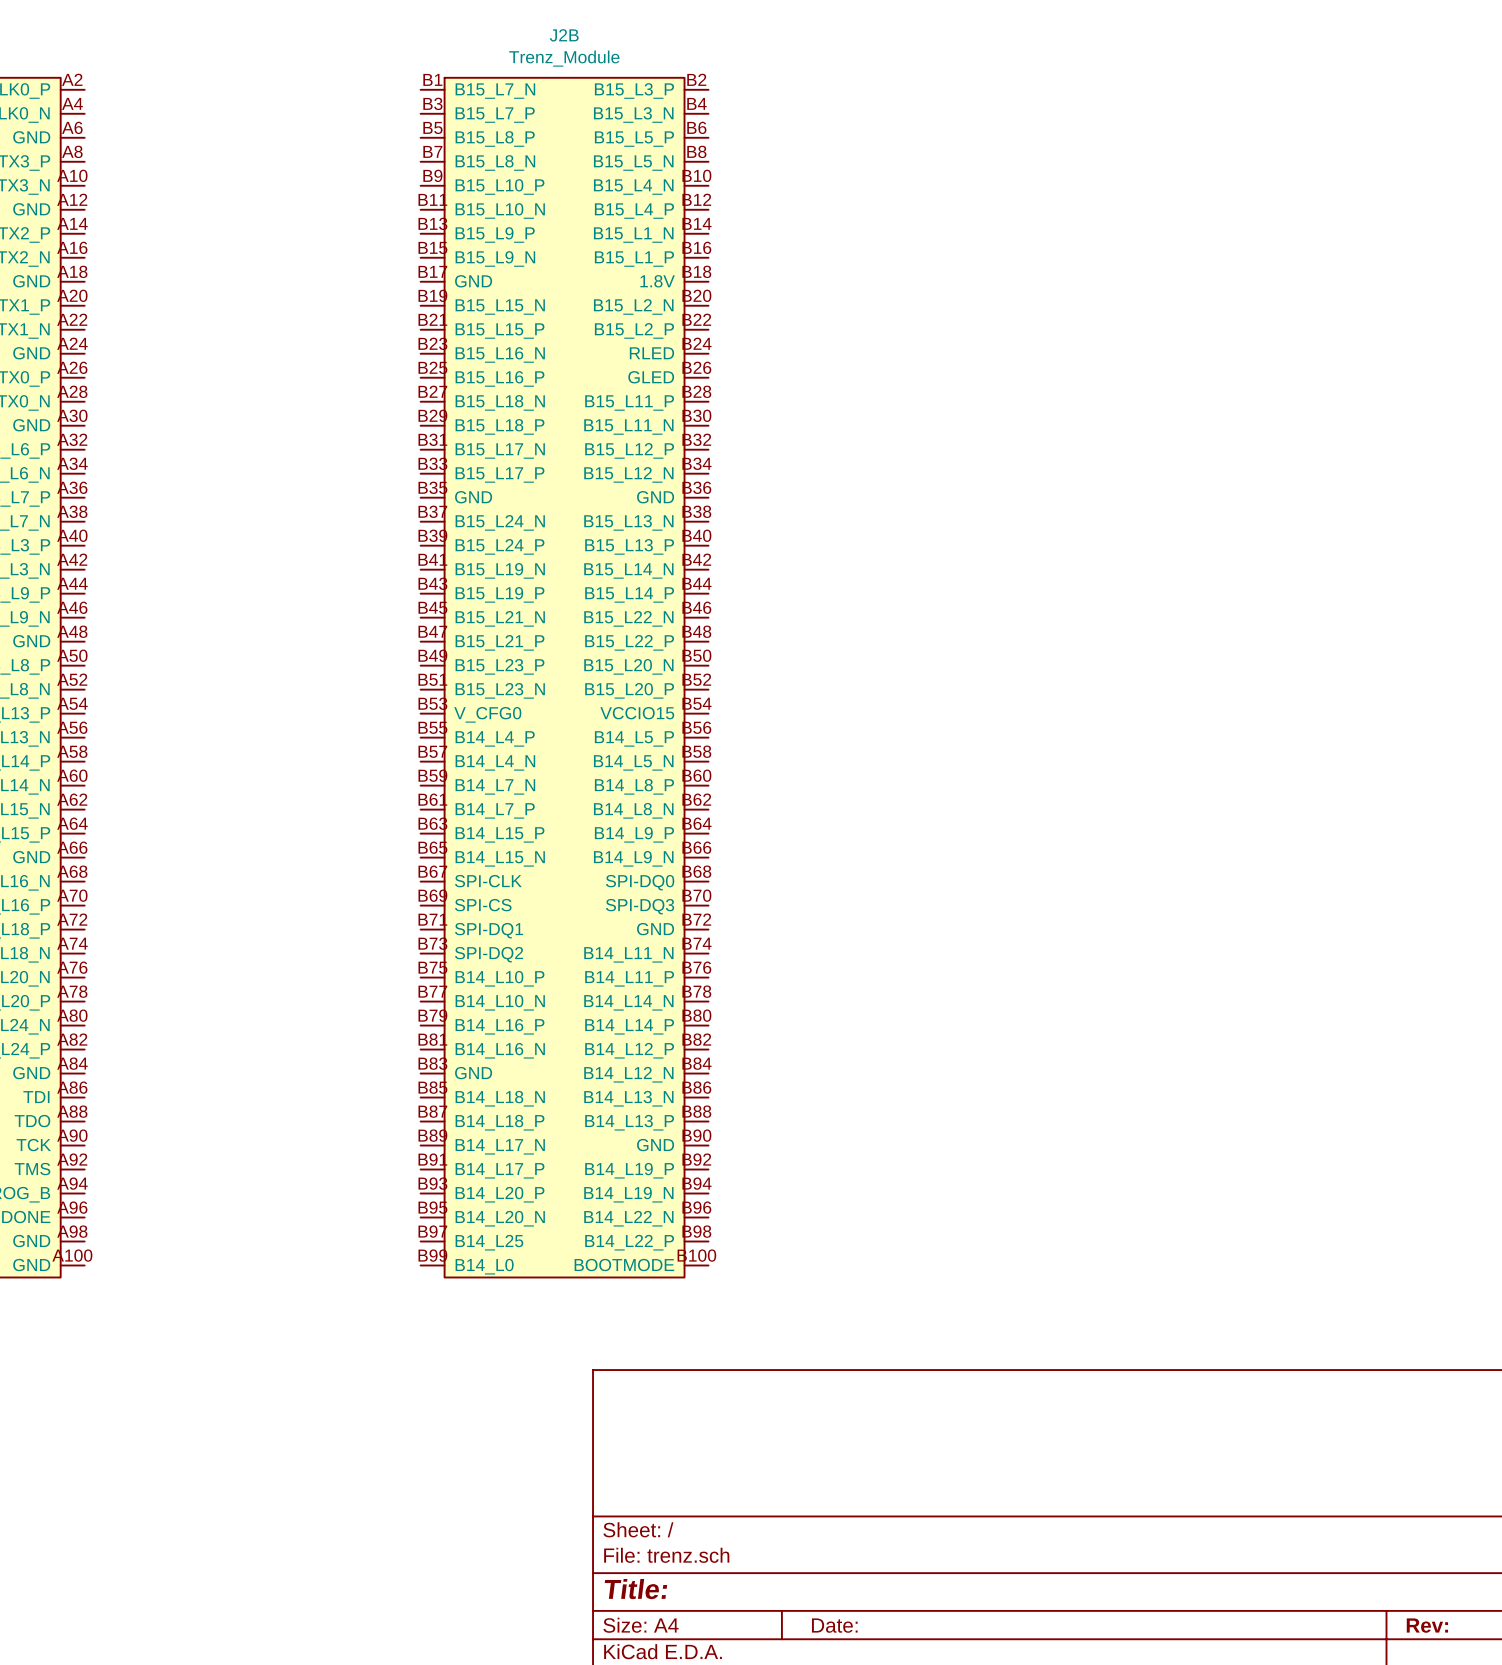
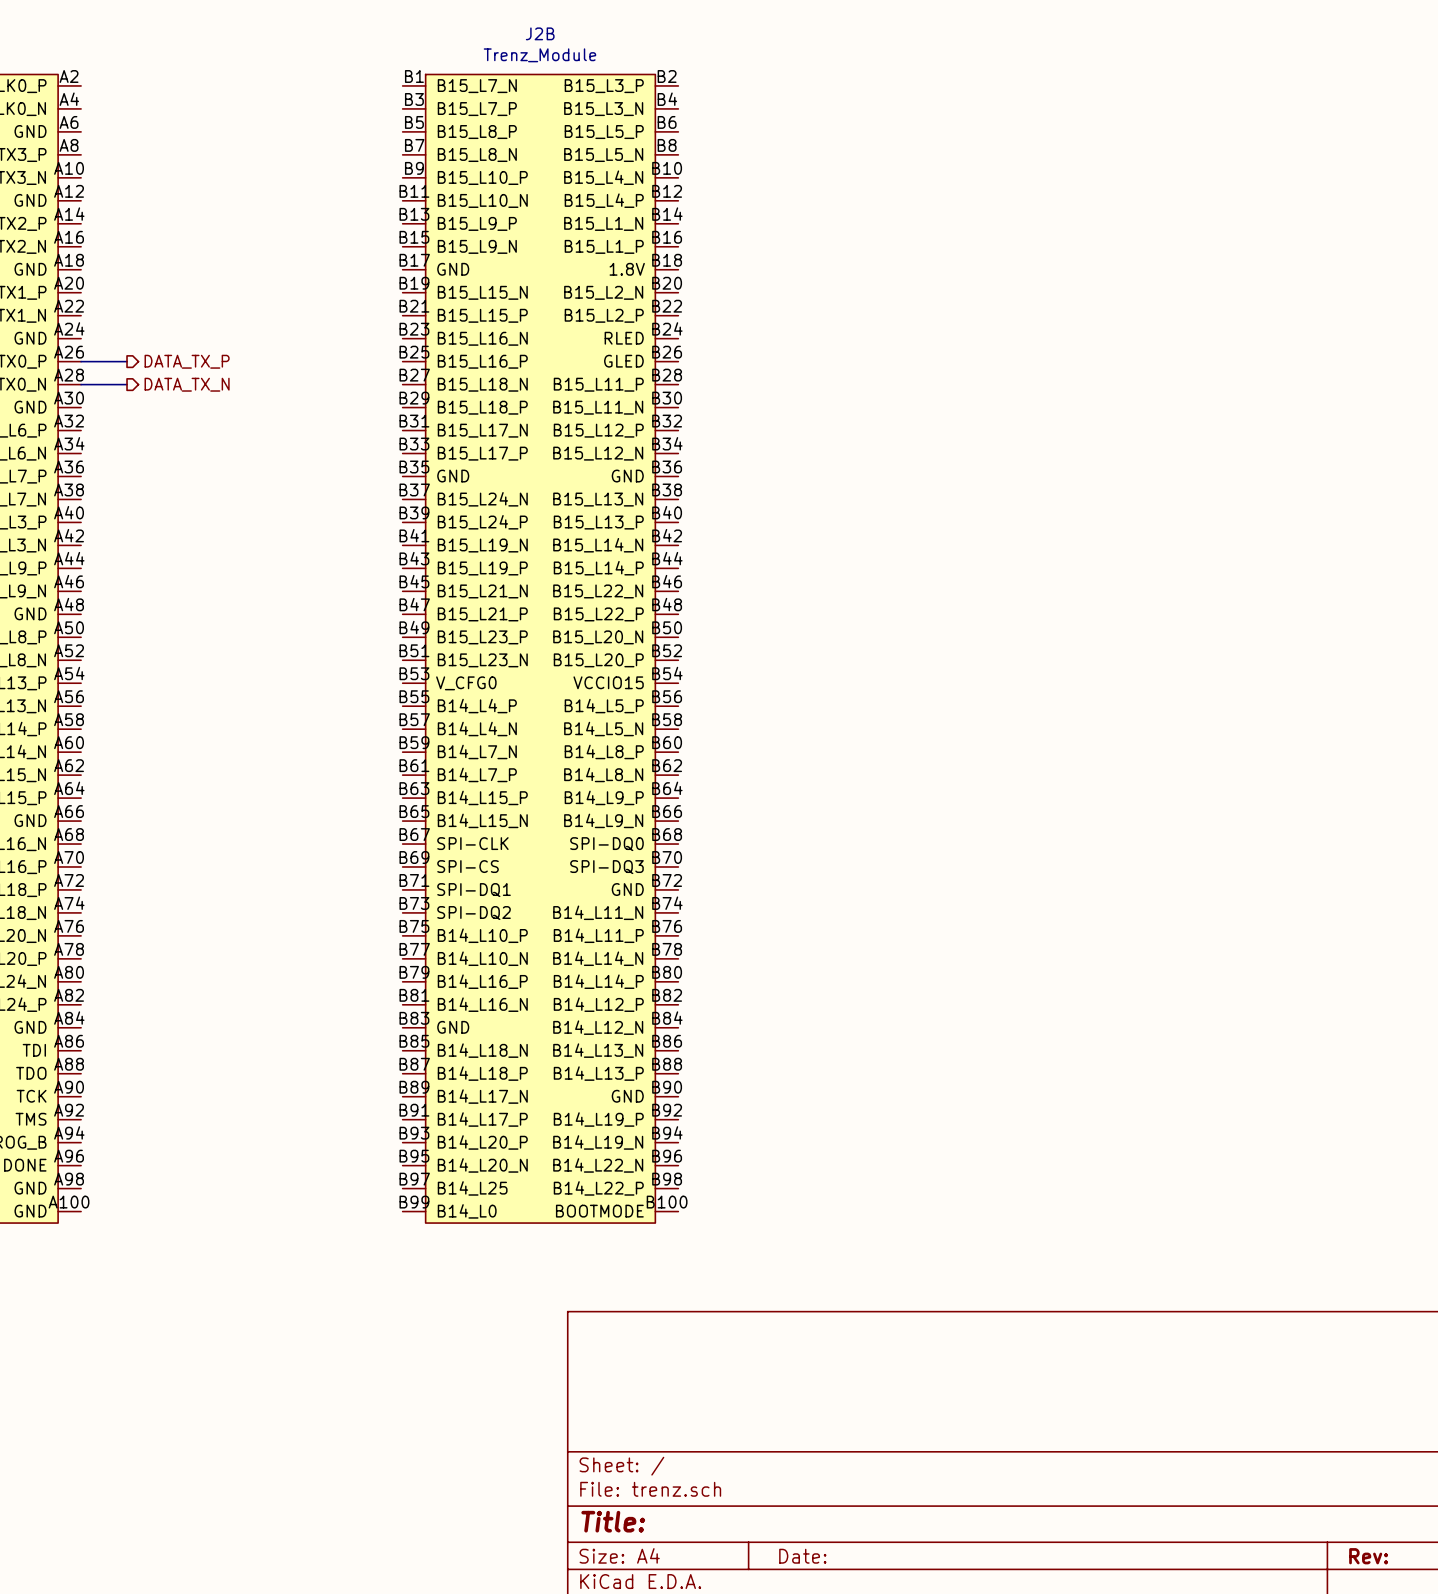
wire: none -> (81, 361) (127, 361)
hierarchical label: none -> DATA_TX_P (187, 361)
wire: none -> (81, 384) (127, 384)
hierarchical label: none -> DATA_TX_N (187, 384)

